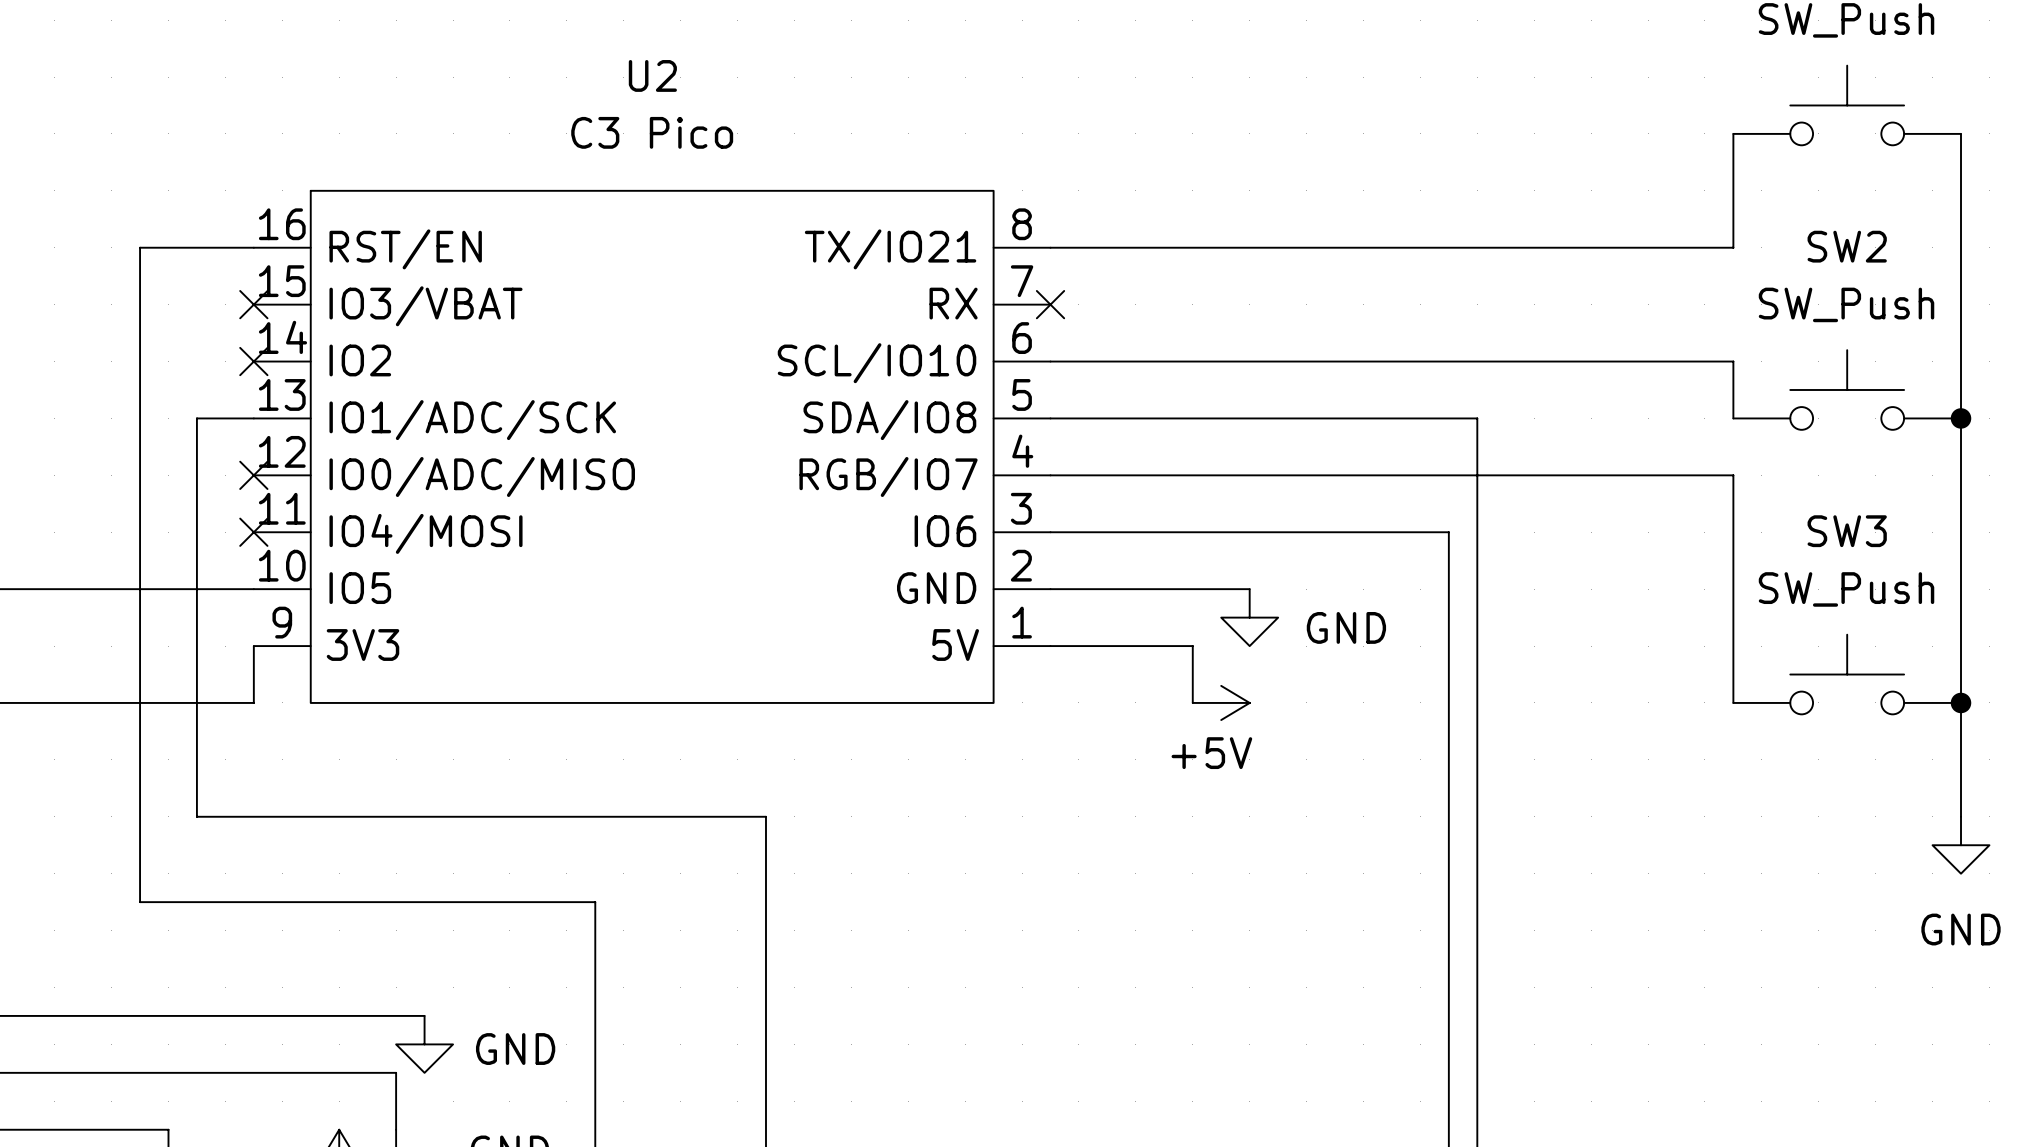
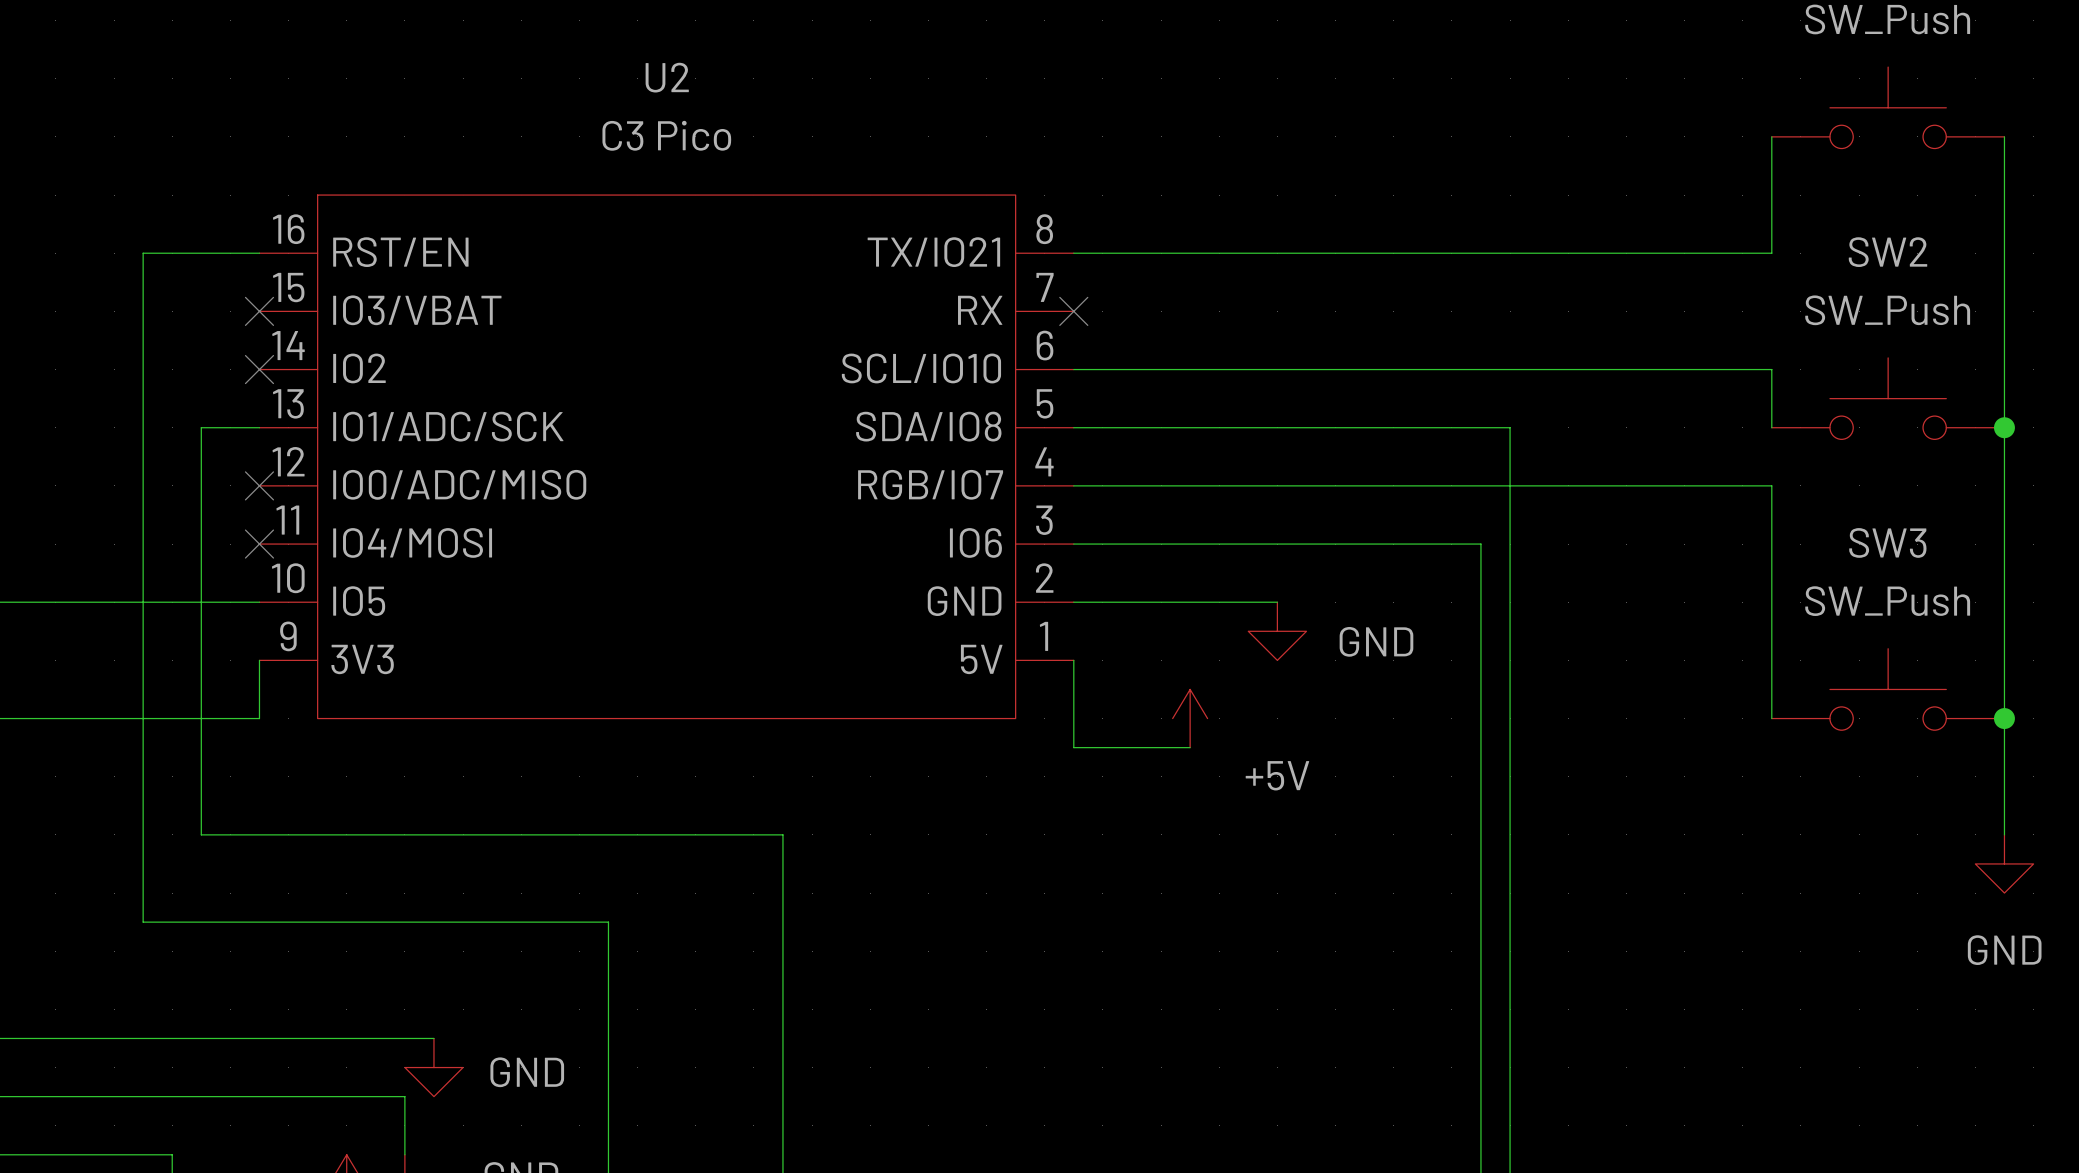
wire: (1050, 646) (1192, 646) (1192, 702) -> (1073, 660) (1073, 747) (1190, 747)
power symbol rotation: 0° (1221, 702) -> 90° counterclockwise (1190, 718)
power symbol position: +5V (1221, 702) -> +5V (1190, 718)
power symbol text position: +5V (1211, 753) -> +5V (1277, 775)

